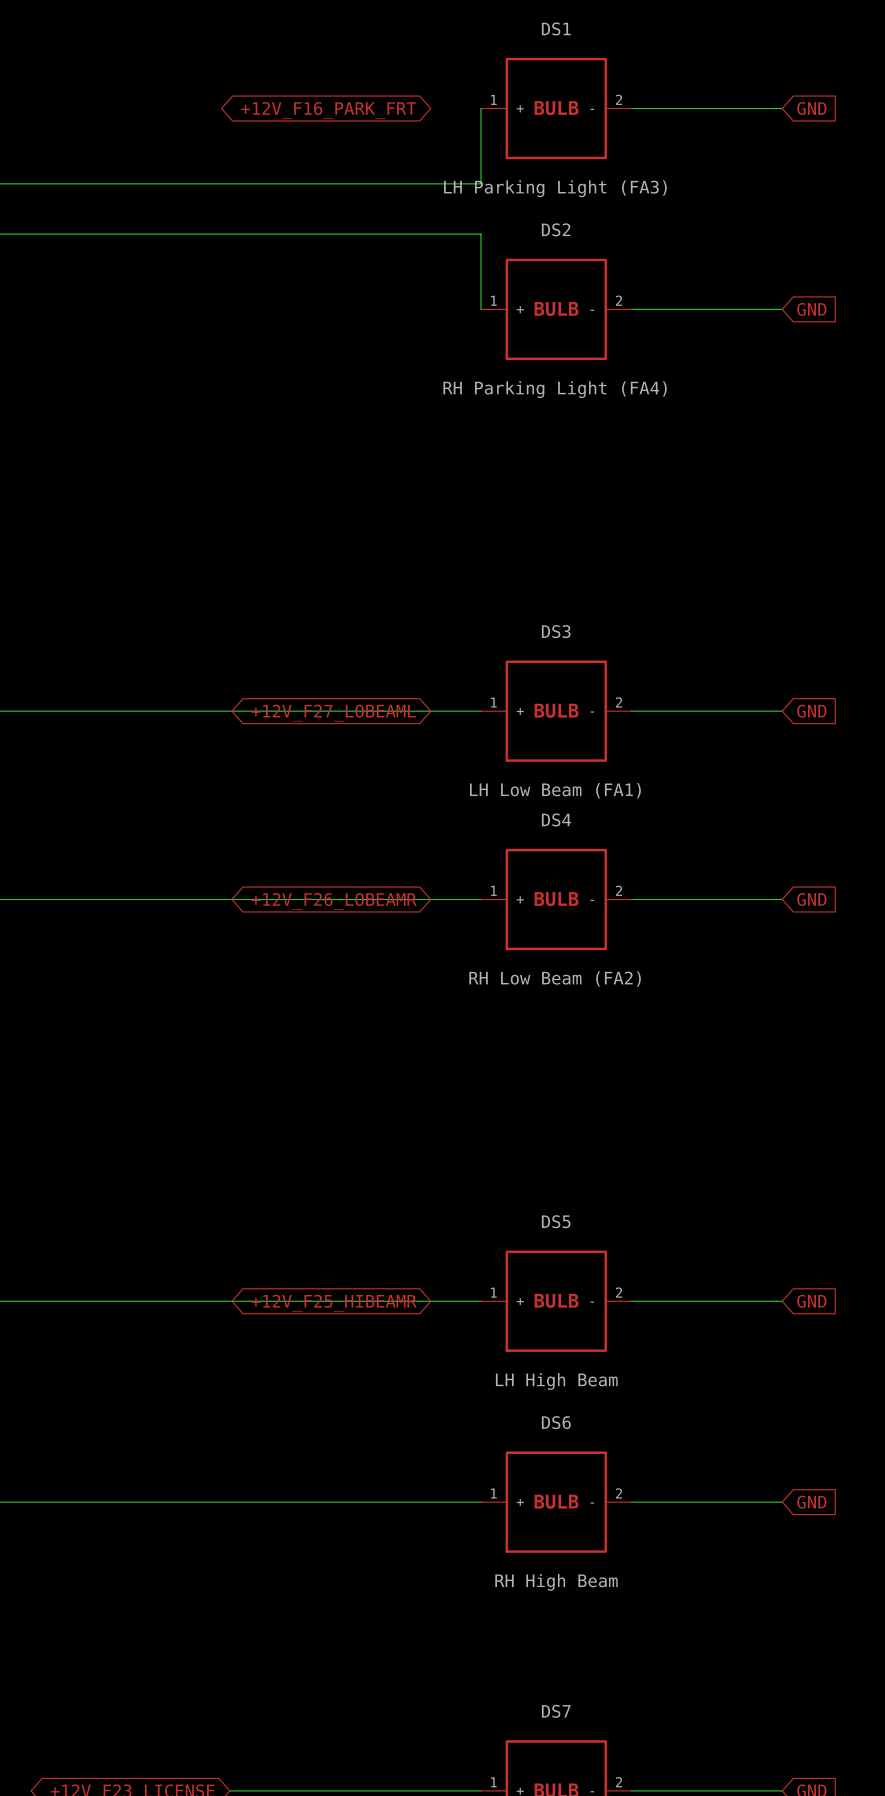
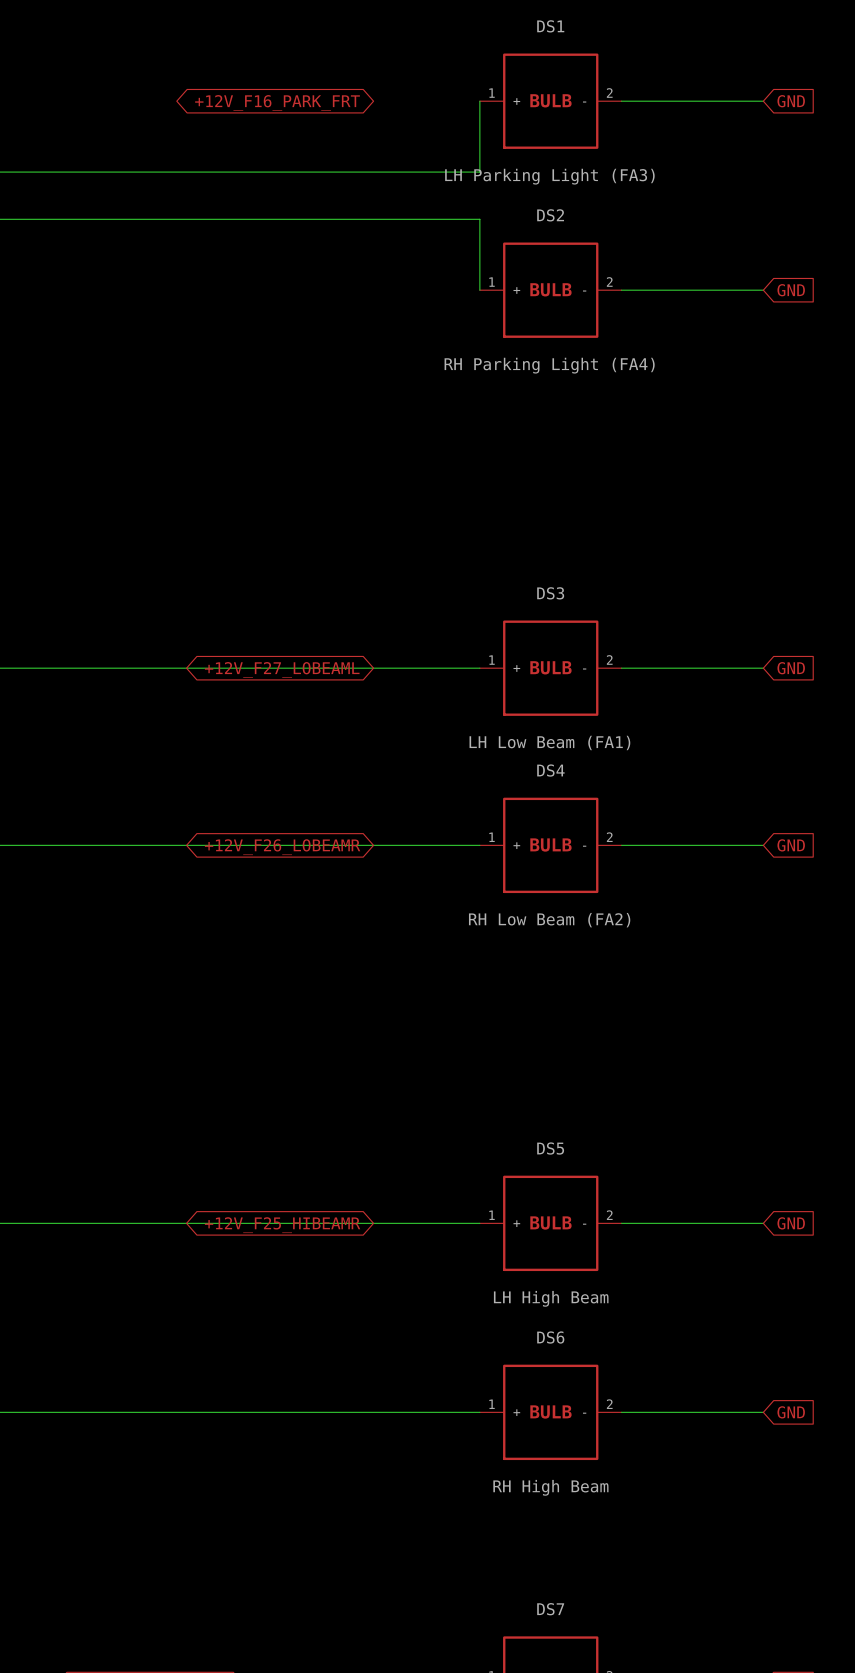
global label position: +12V_F16_PARK_FRT (328, 110) -> +12V_F16_PARK_FRT (277, 103)
global label position: +12V_F27_LOBEAML (333, 713) -> +12V_F27_LOBEAML (282, 669)
global label position: +12V_F26_LOBEAMR (334, 901) -> +12V_F26_LOBEAMR (282, 847)
global label position: +12V_F25_HIBEAMR (334, 1303) -> +12V_F25_HIBEAMR (282, 1225)

